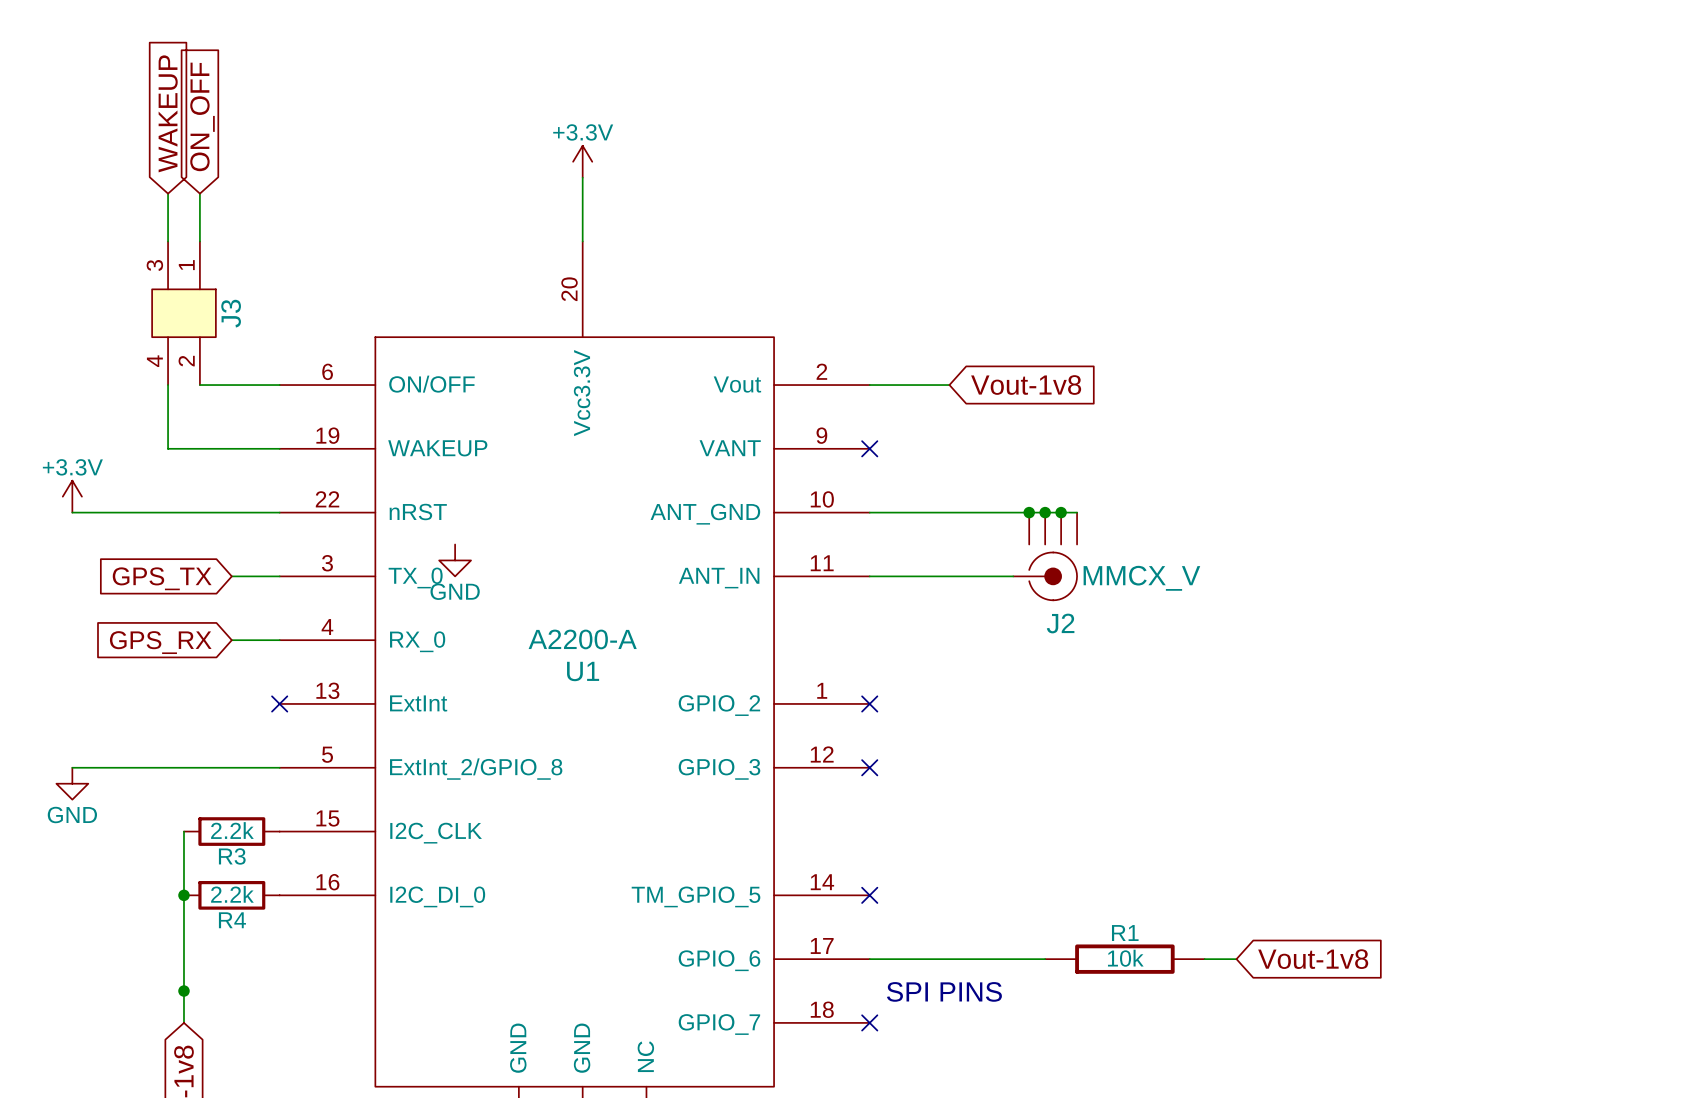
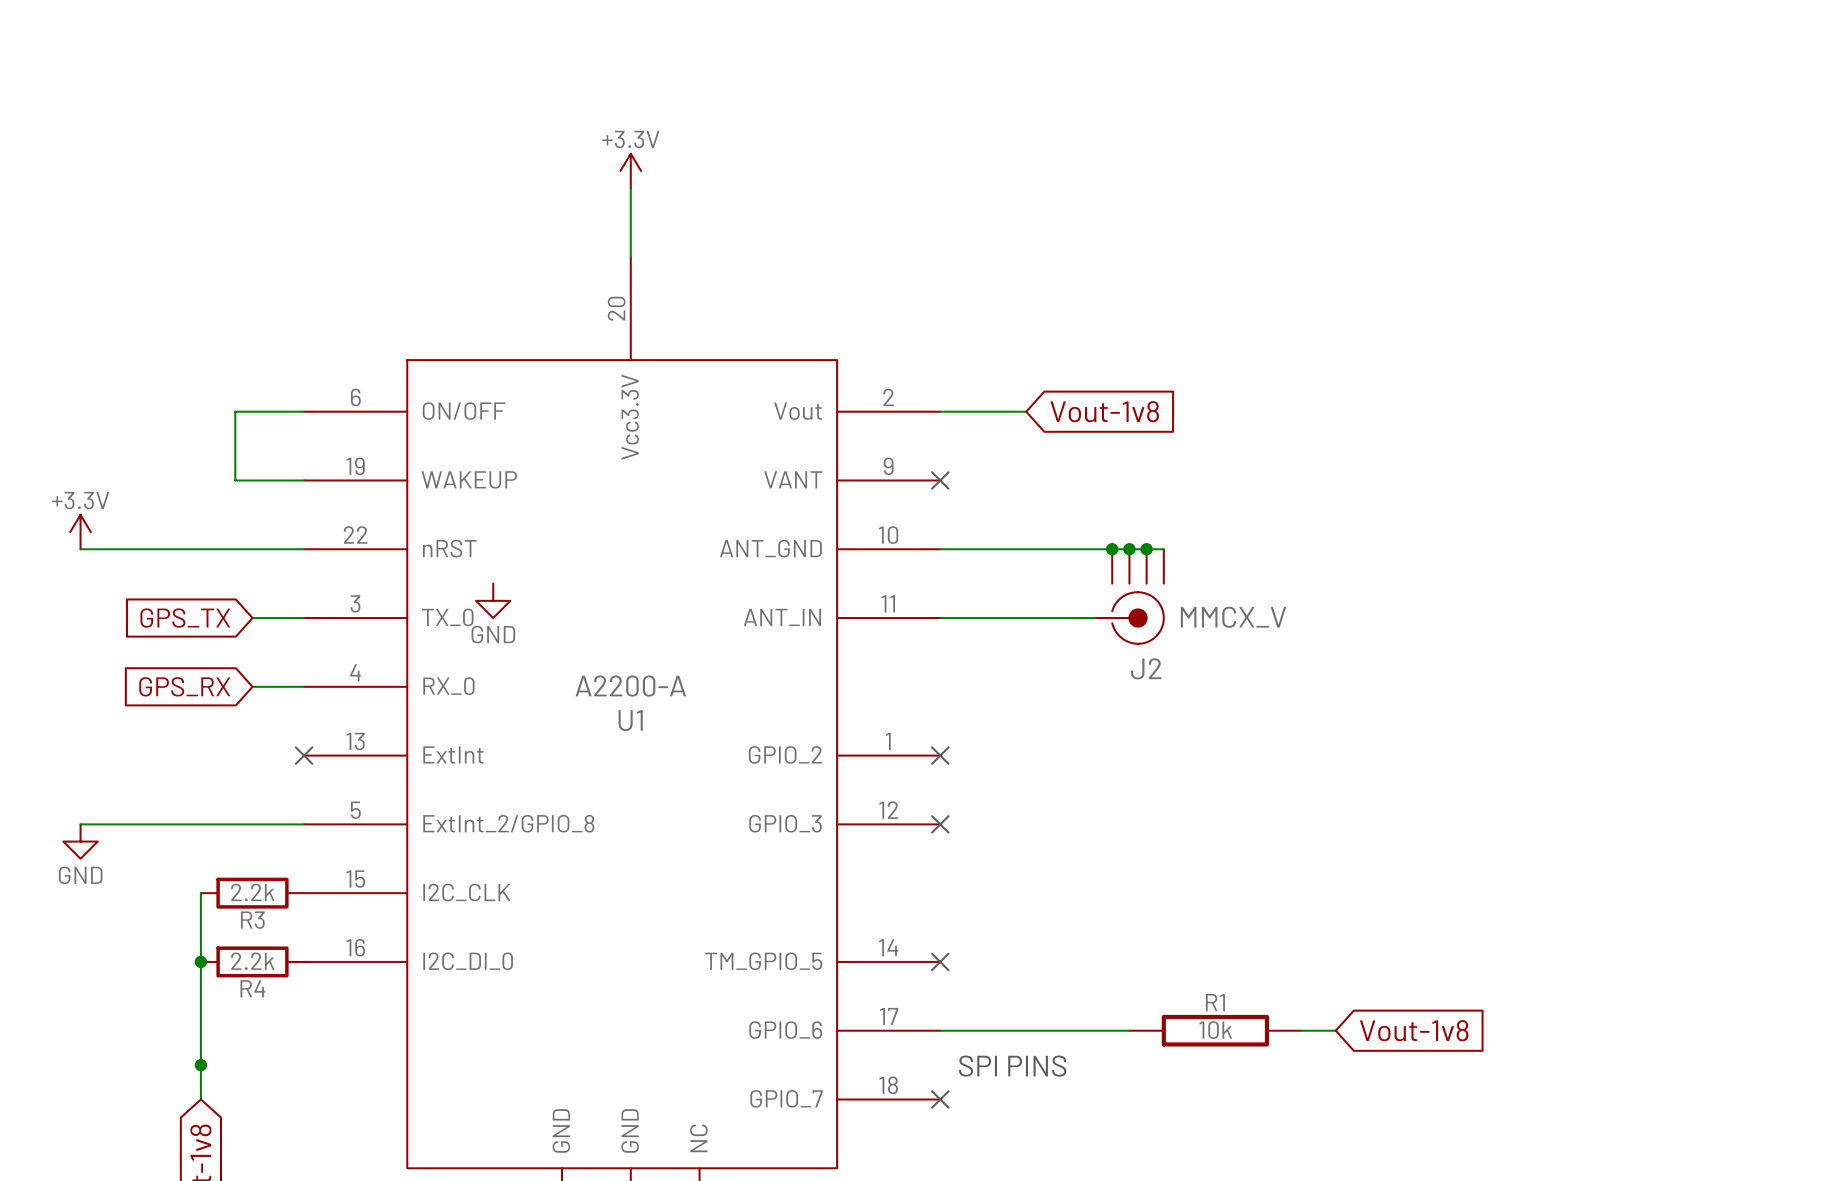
global label: WAKEUP (168, 113) -> none
global label: ON_OFF (202, 116) -> none
wire: (168, 193) (168, 241) -> none
wire: (199, 193) (199, 241) -> none
J3: (183, 313) -> none
wire: (168, 385) (168, 448) (215, 448) -> (235, 411) (235, 480)
wire: (199, 385) (215, 385) -> none

